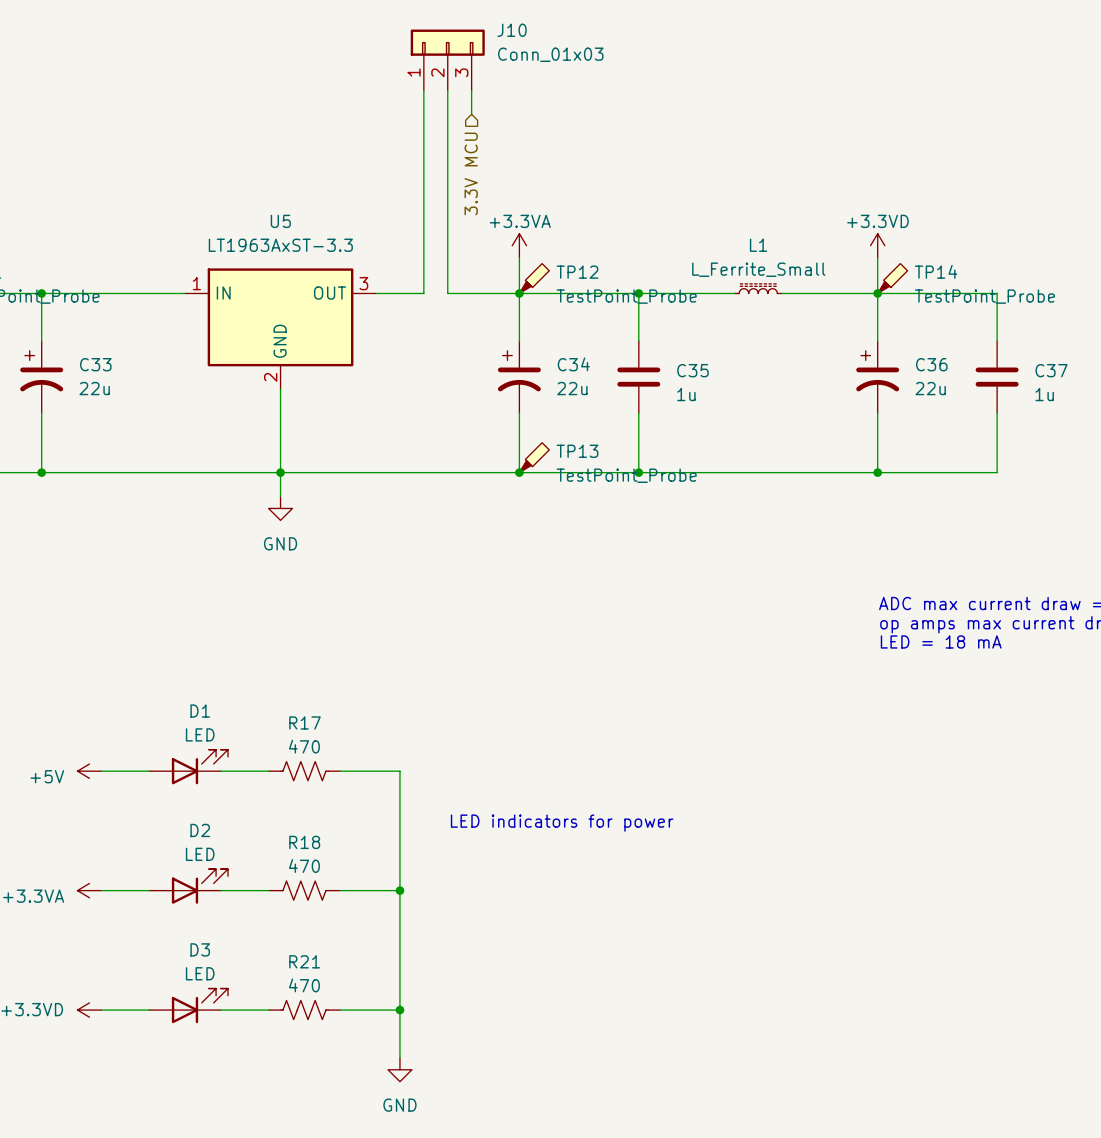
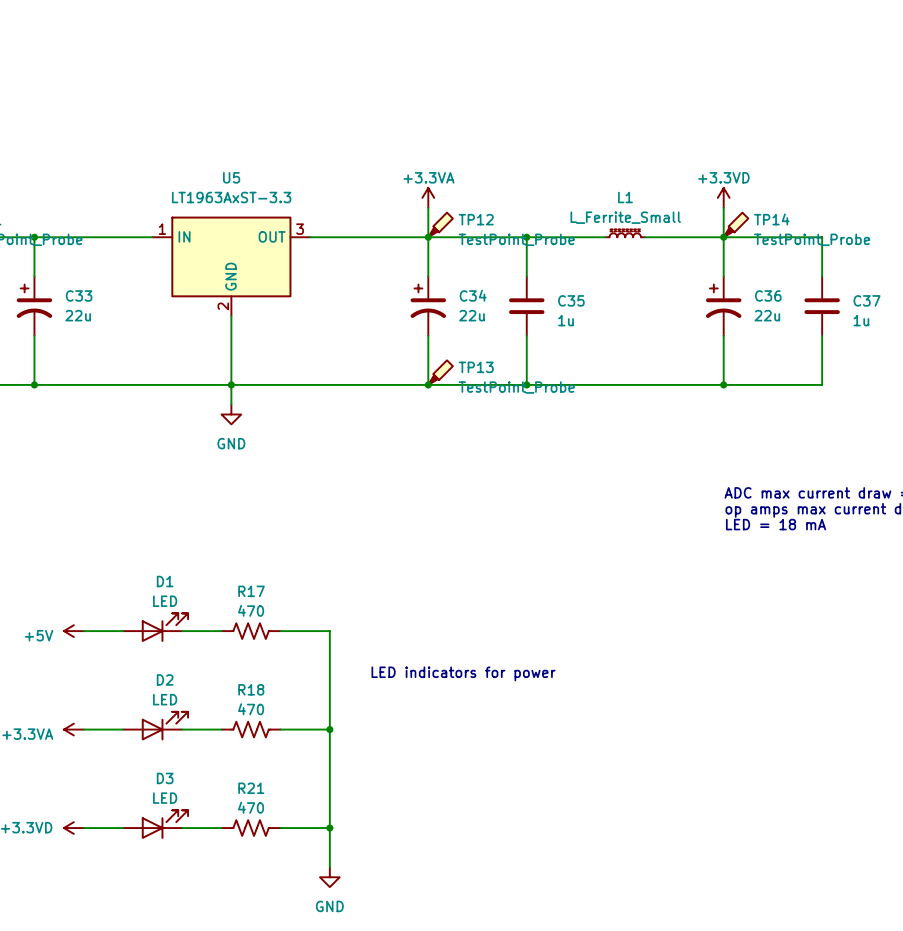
J10: Conn_01x03 (447, 59) -> none
wire: (423, 90) (423, 293) -> (369, 237) (349, 237)
wire: (447, 90) (447, 293) -> none
wire: (471, 90) (471, 114) -> none
hierarchical label: 3.3V MCU (471, 173) -> none

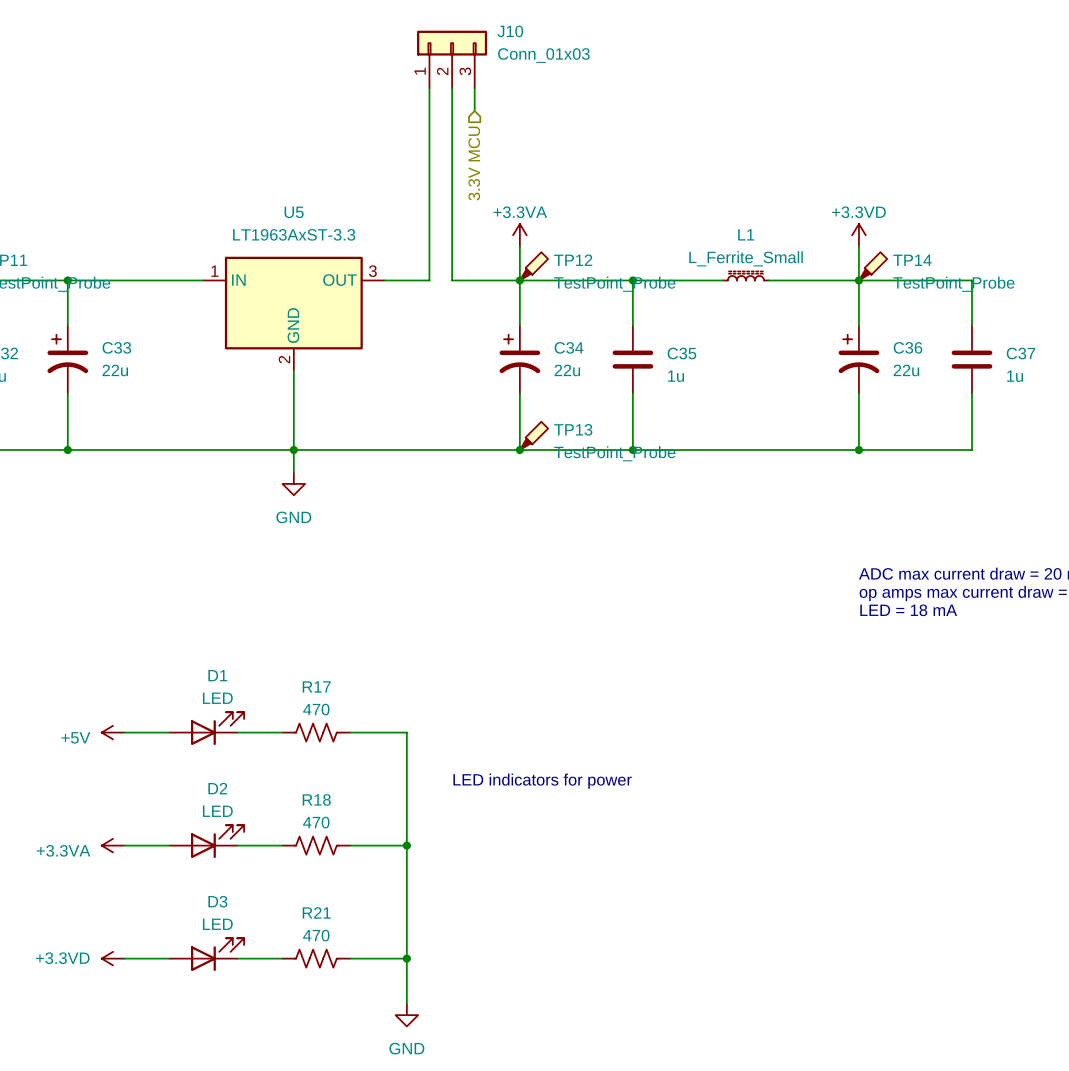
J10: none -> Conn_01x03 (452, 59)
wire: none -> (452, 88) (452, 280)
wire: none -> (474, 88) (474, 110)
hierarchical label: none -> 3.3V MCU (474, 163)
wire: (349, 237) (369, 237) -> (429, 280) (429, 88)

